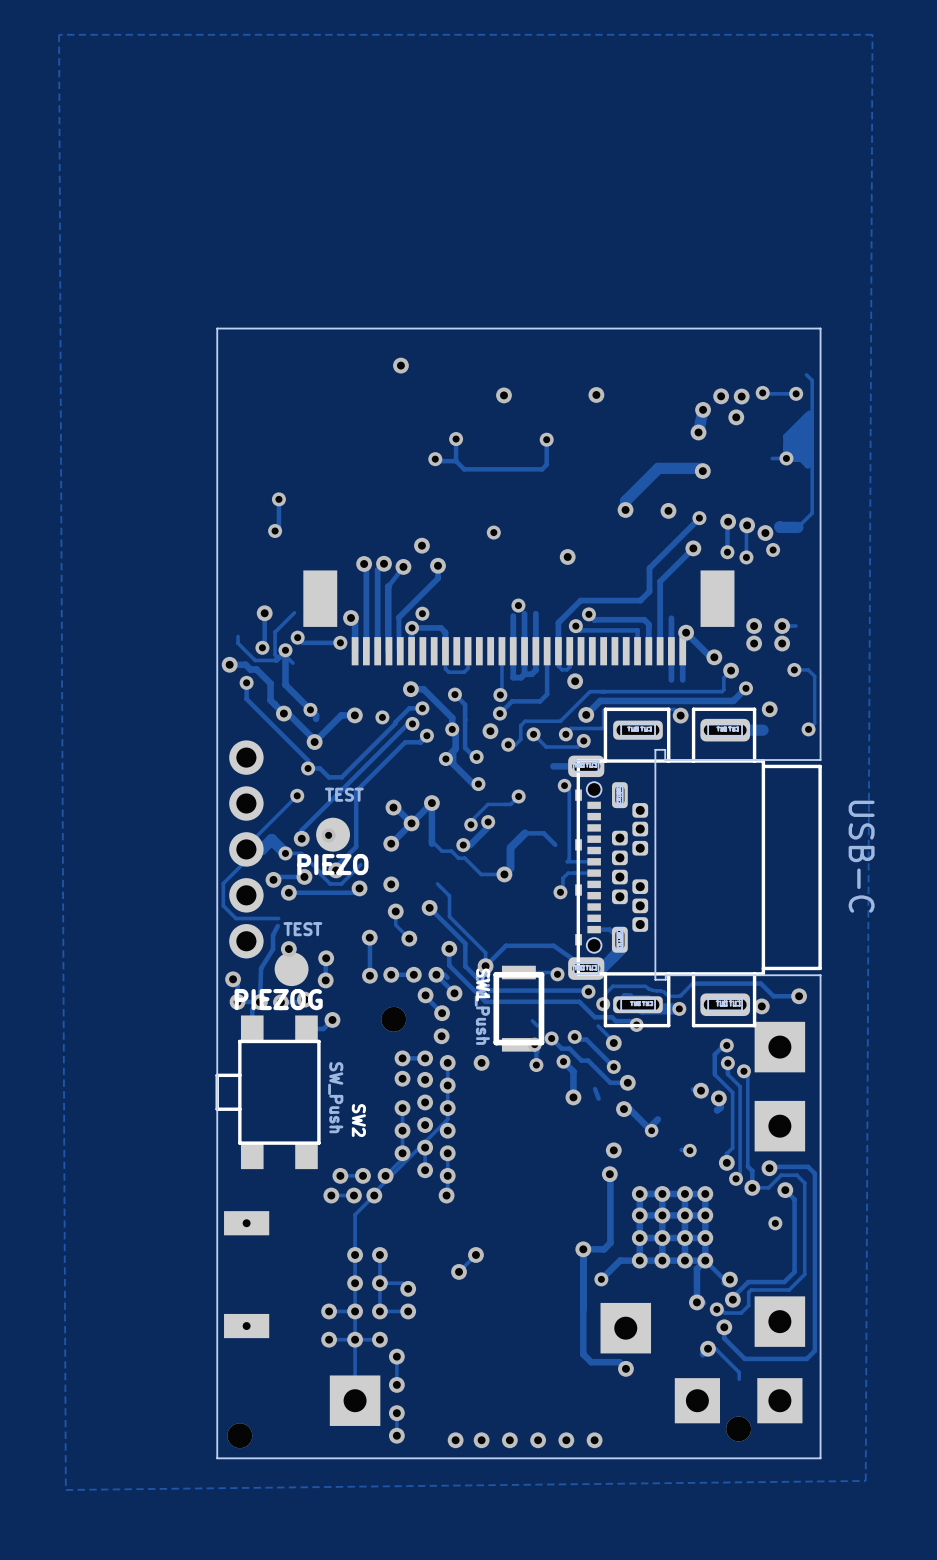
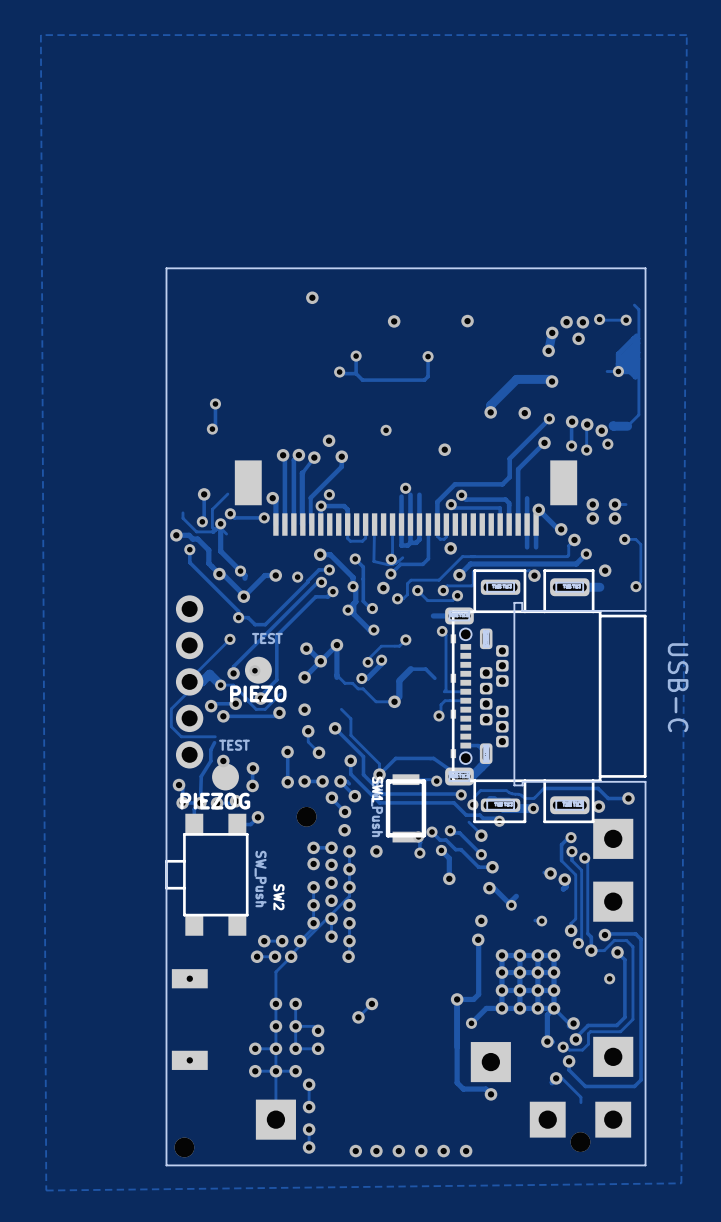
track: none -> (374, 524) (373, 561) (392, 564) (402, 557)
track: (532, 1020) (537, 1026) -> none
track: (595, 1089) (598, 1098) -> none

